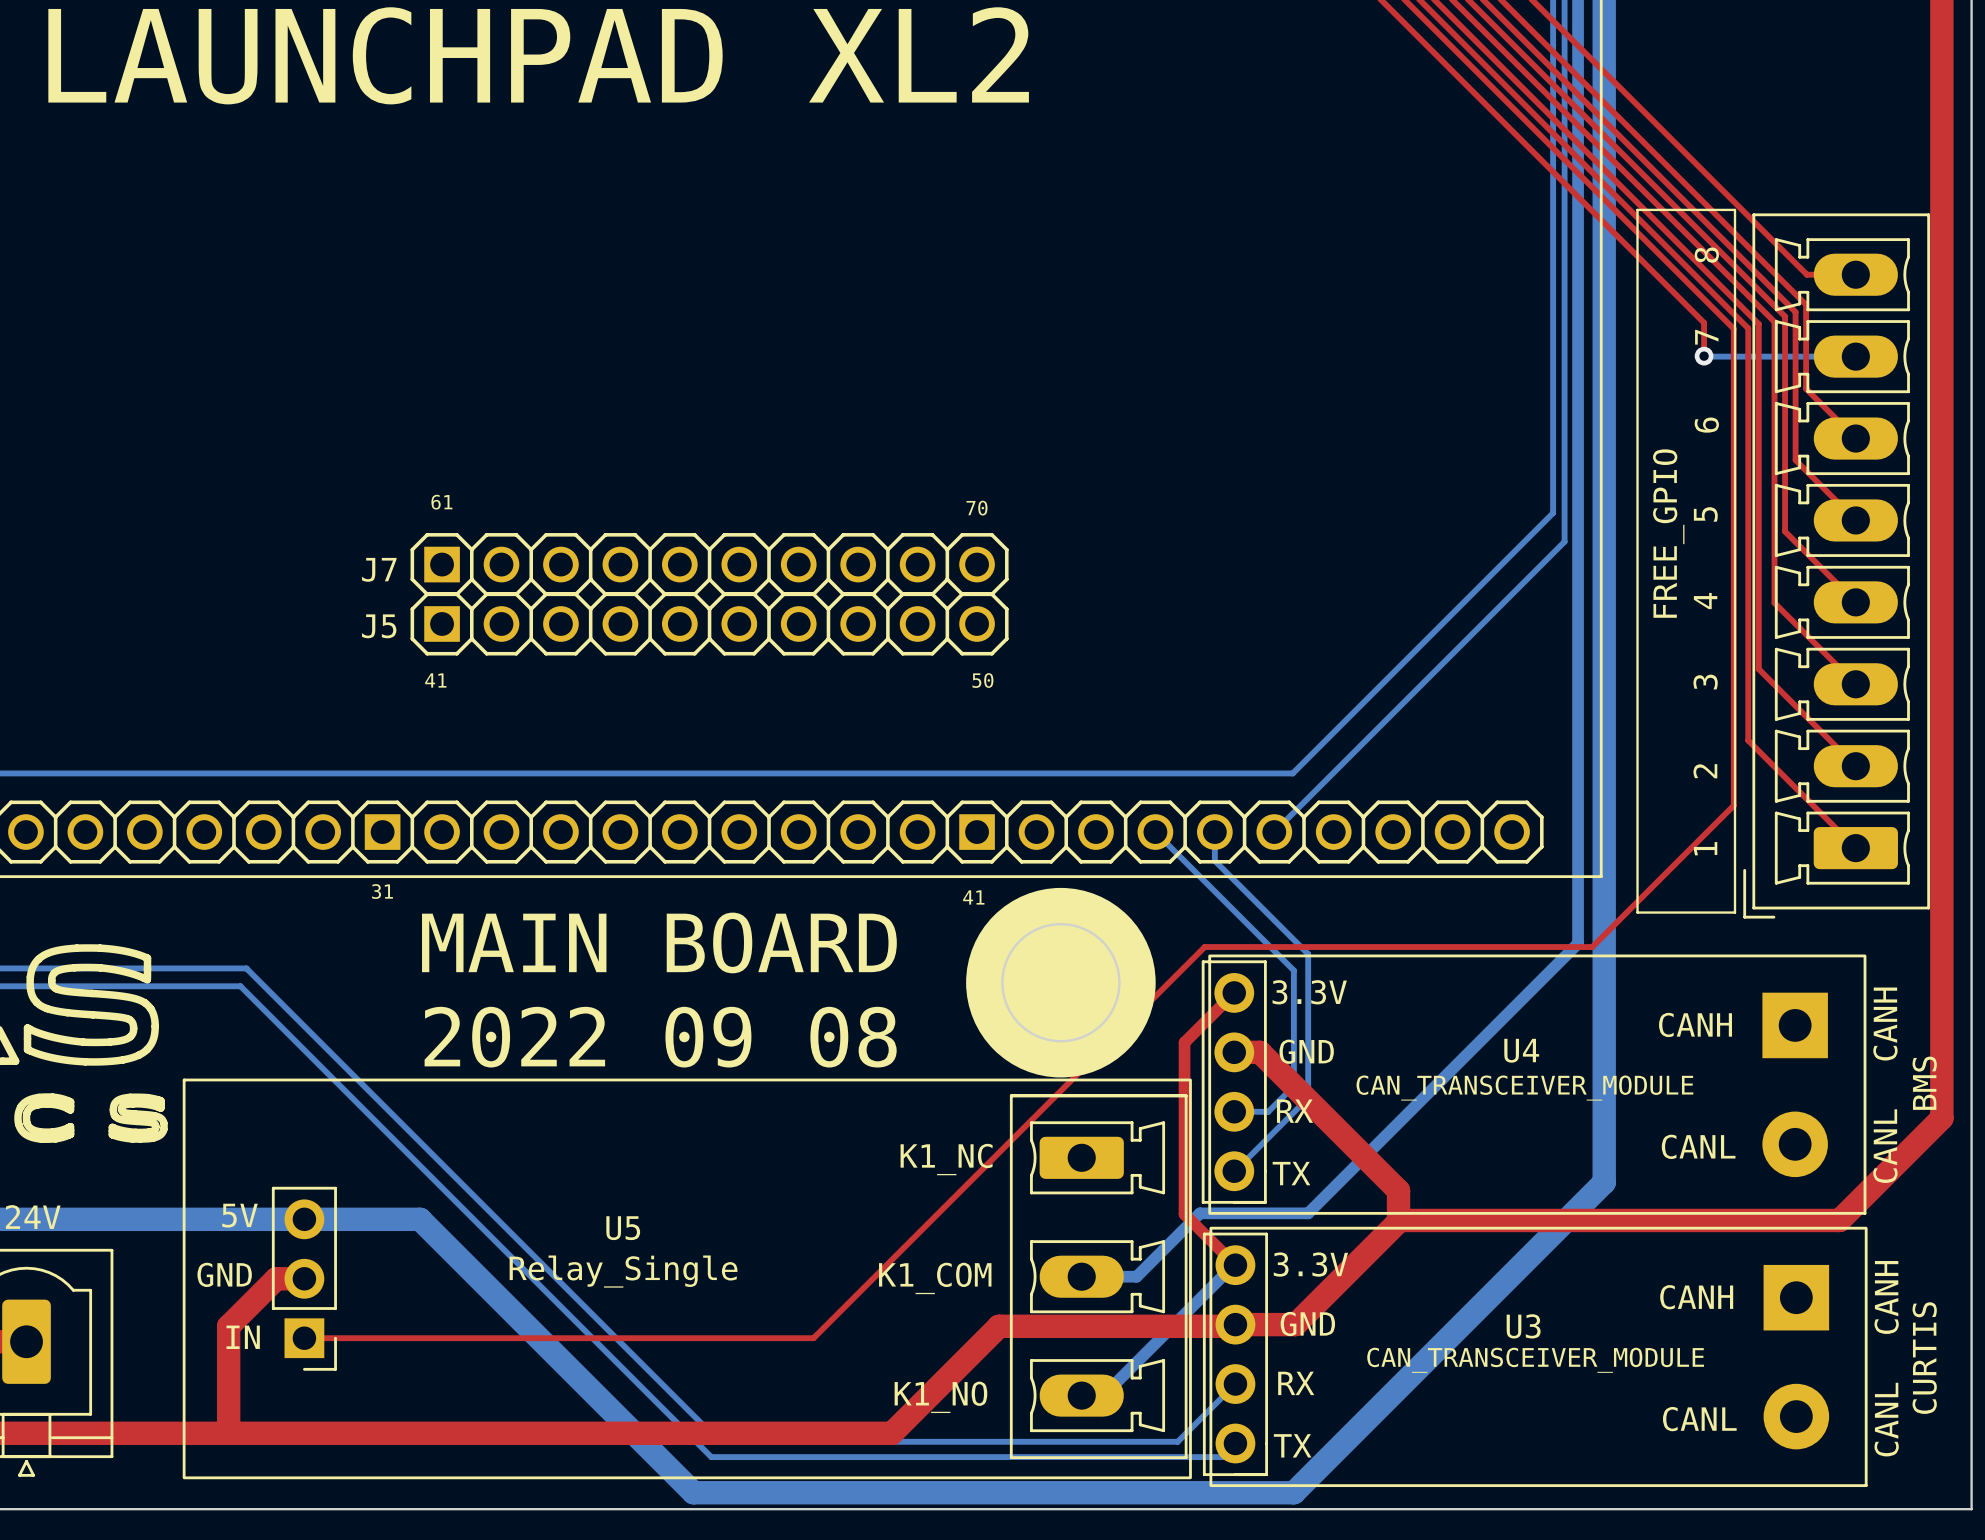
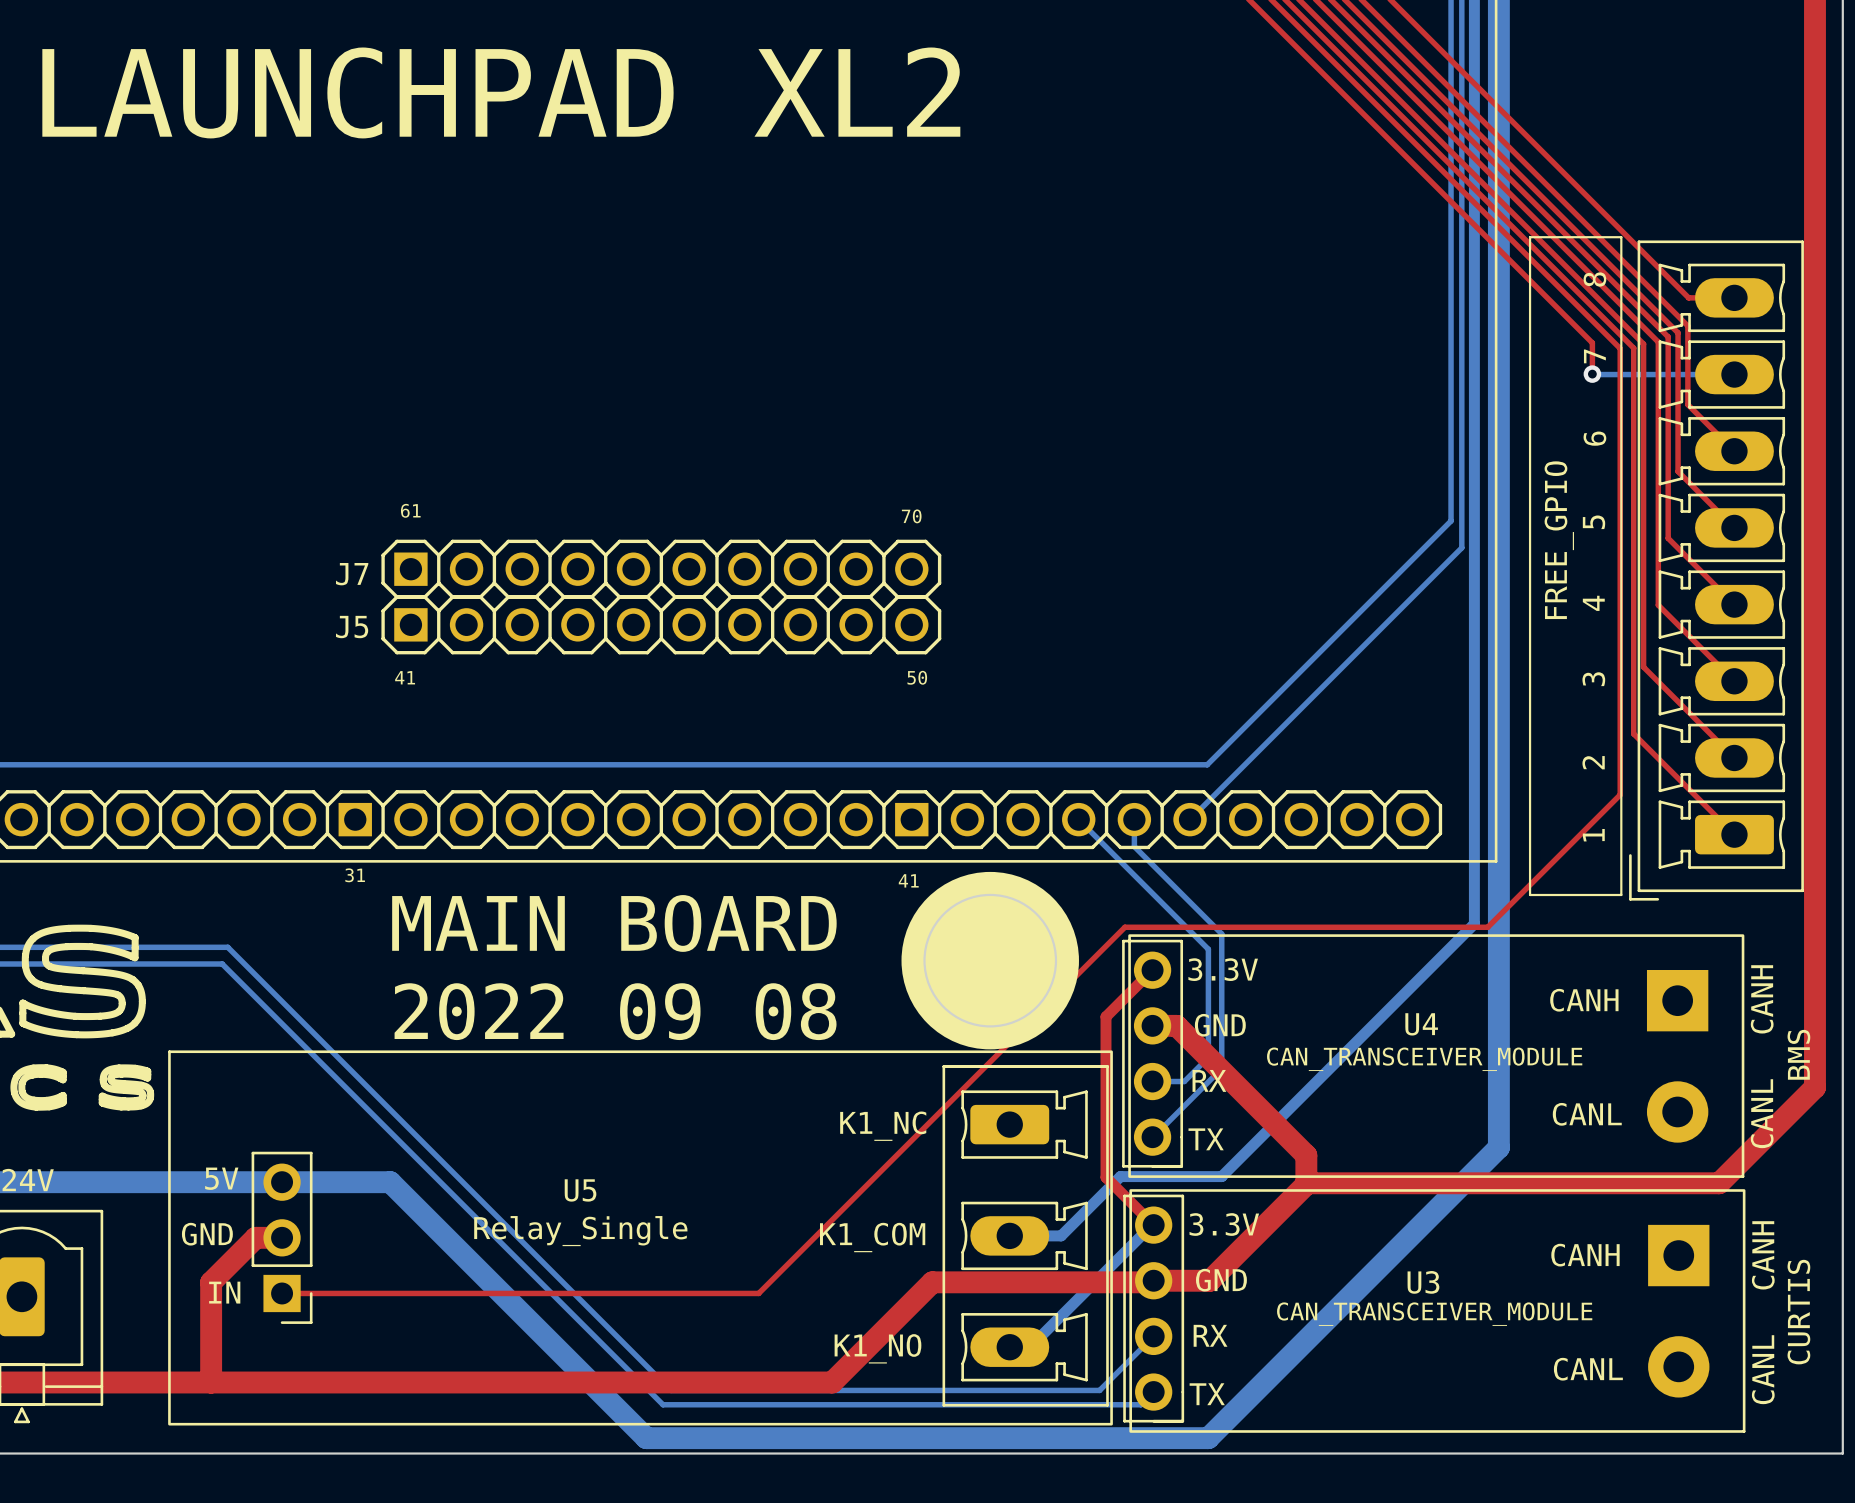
round board edge size: [1001, 923, 1121, 1043] -> [923, 893, 1058, 1028]

